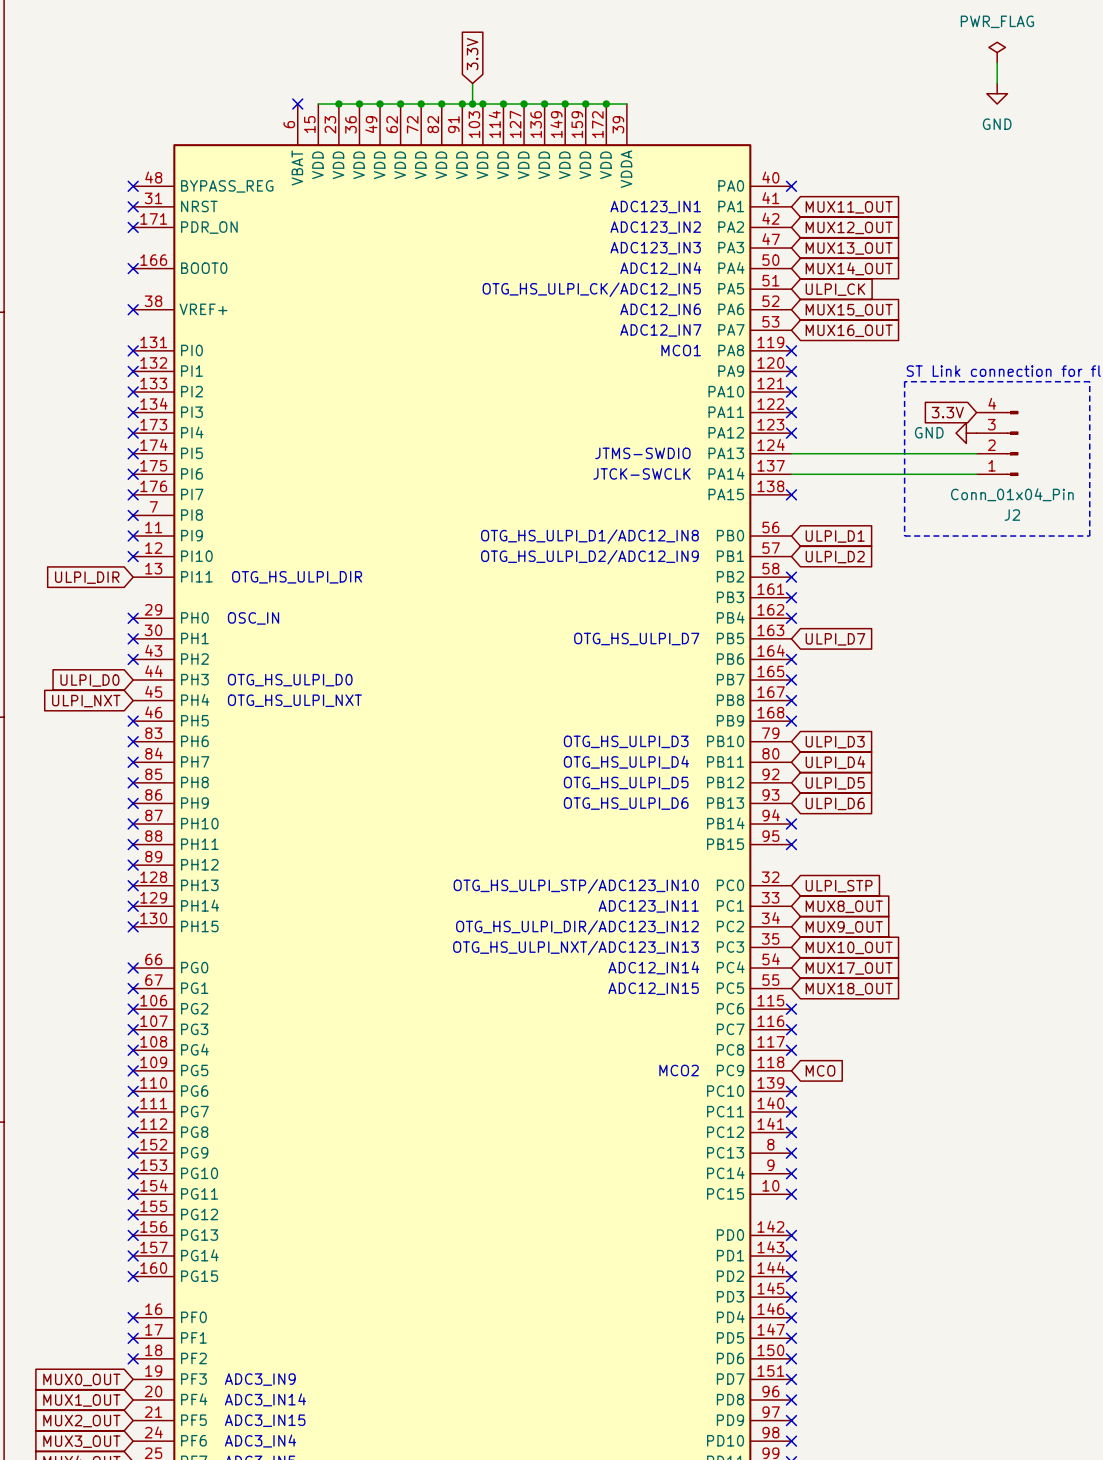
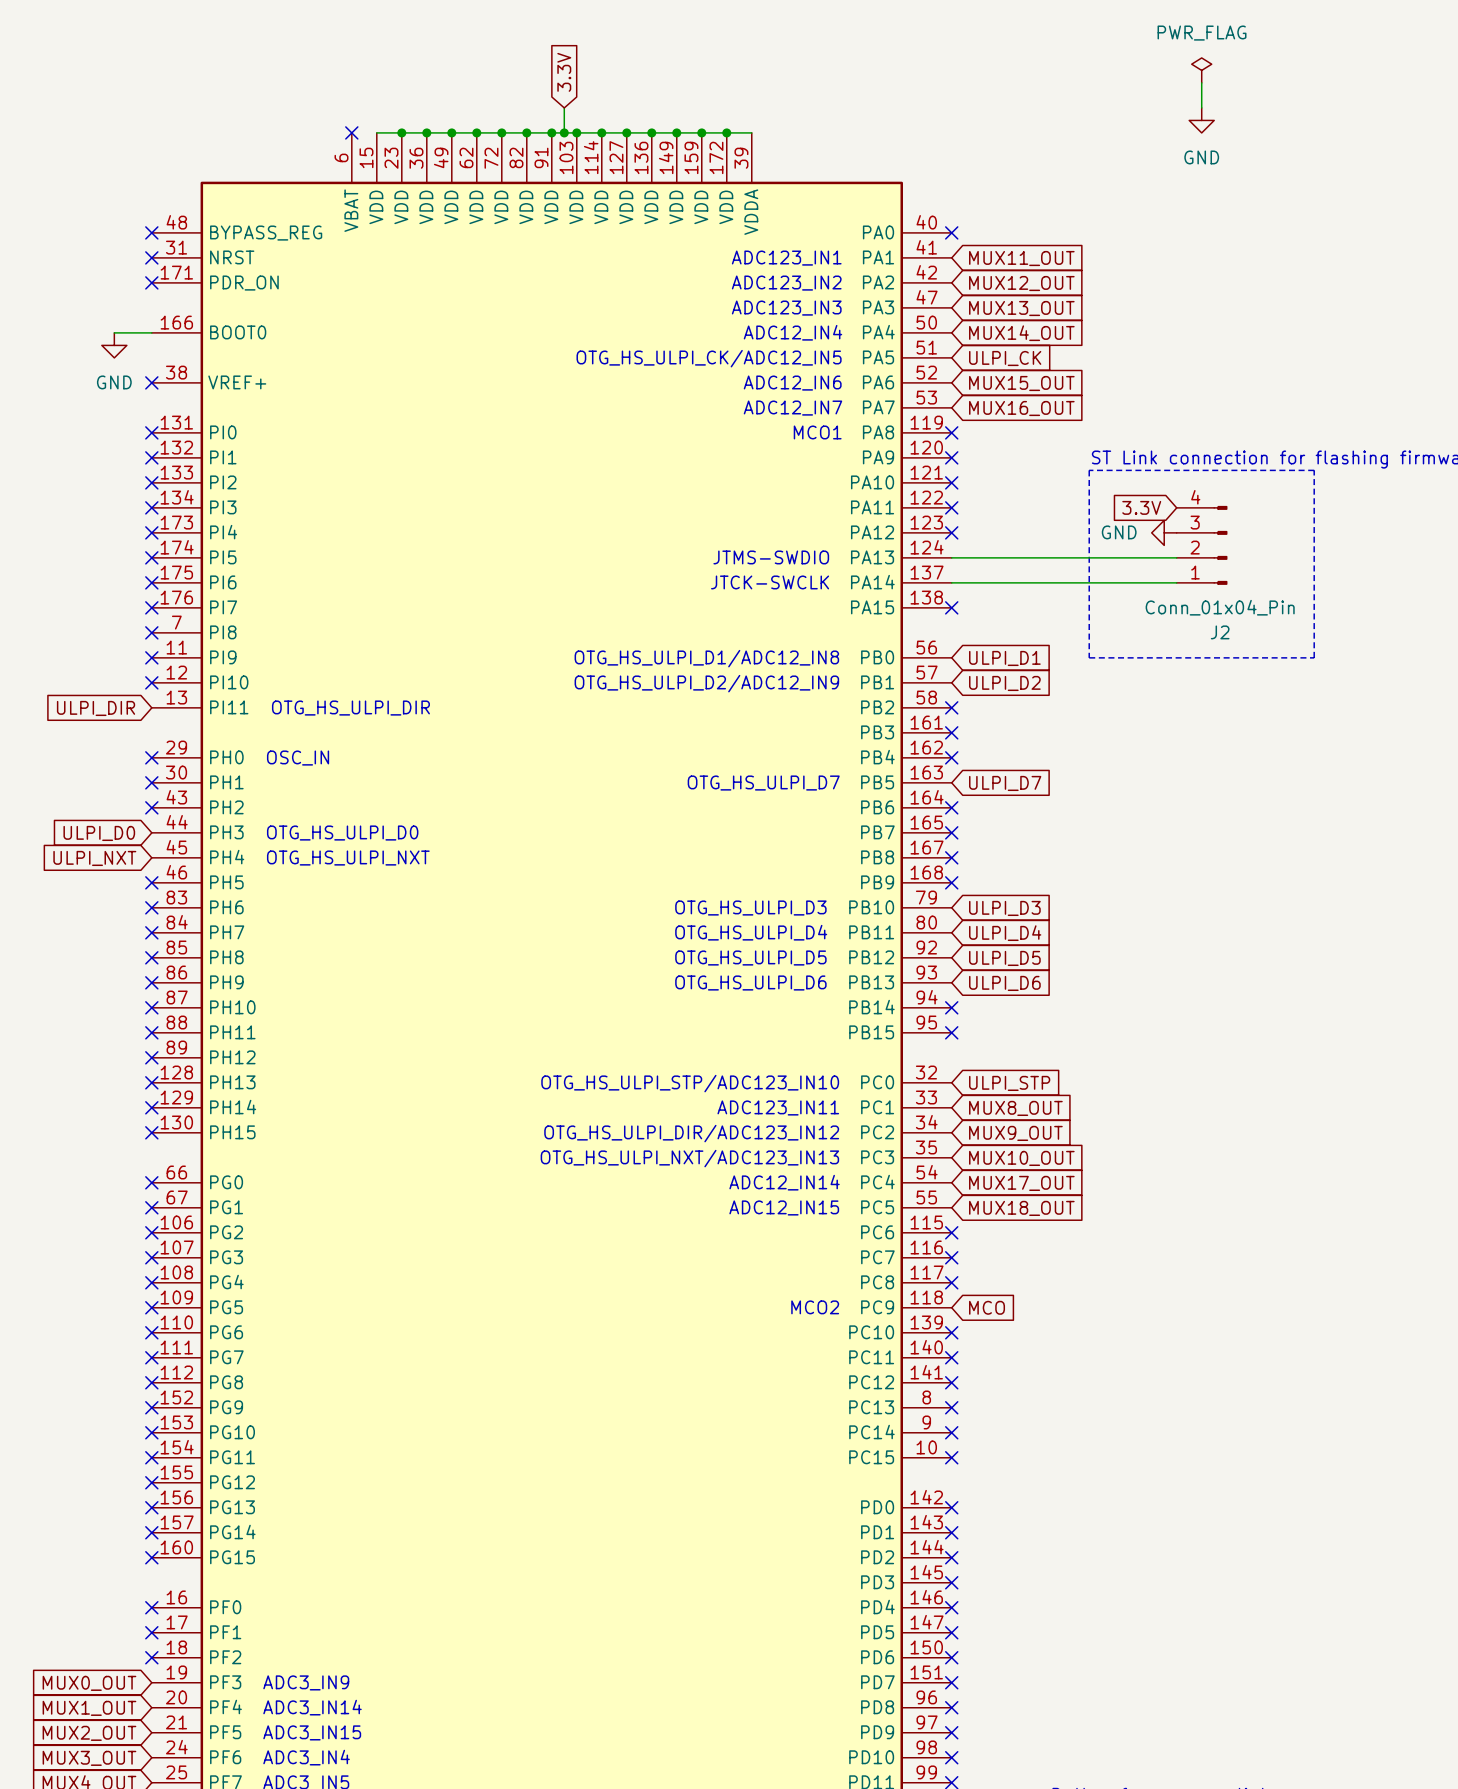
wire: none -> (114, 332) (151, 332)
no-connect mark: (133, 268) -> none
power symbol: none -> GND (114, 345)

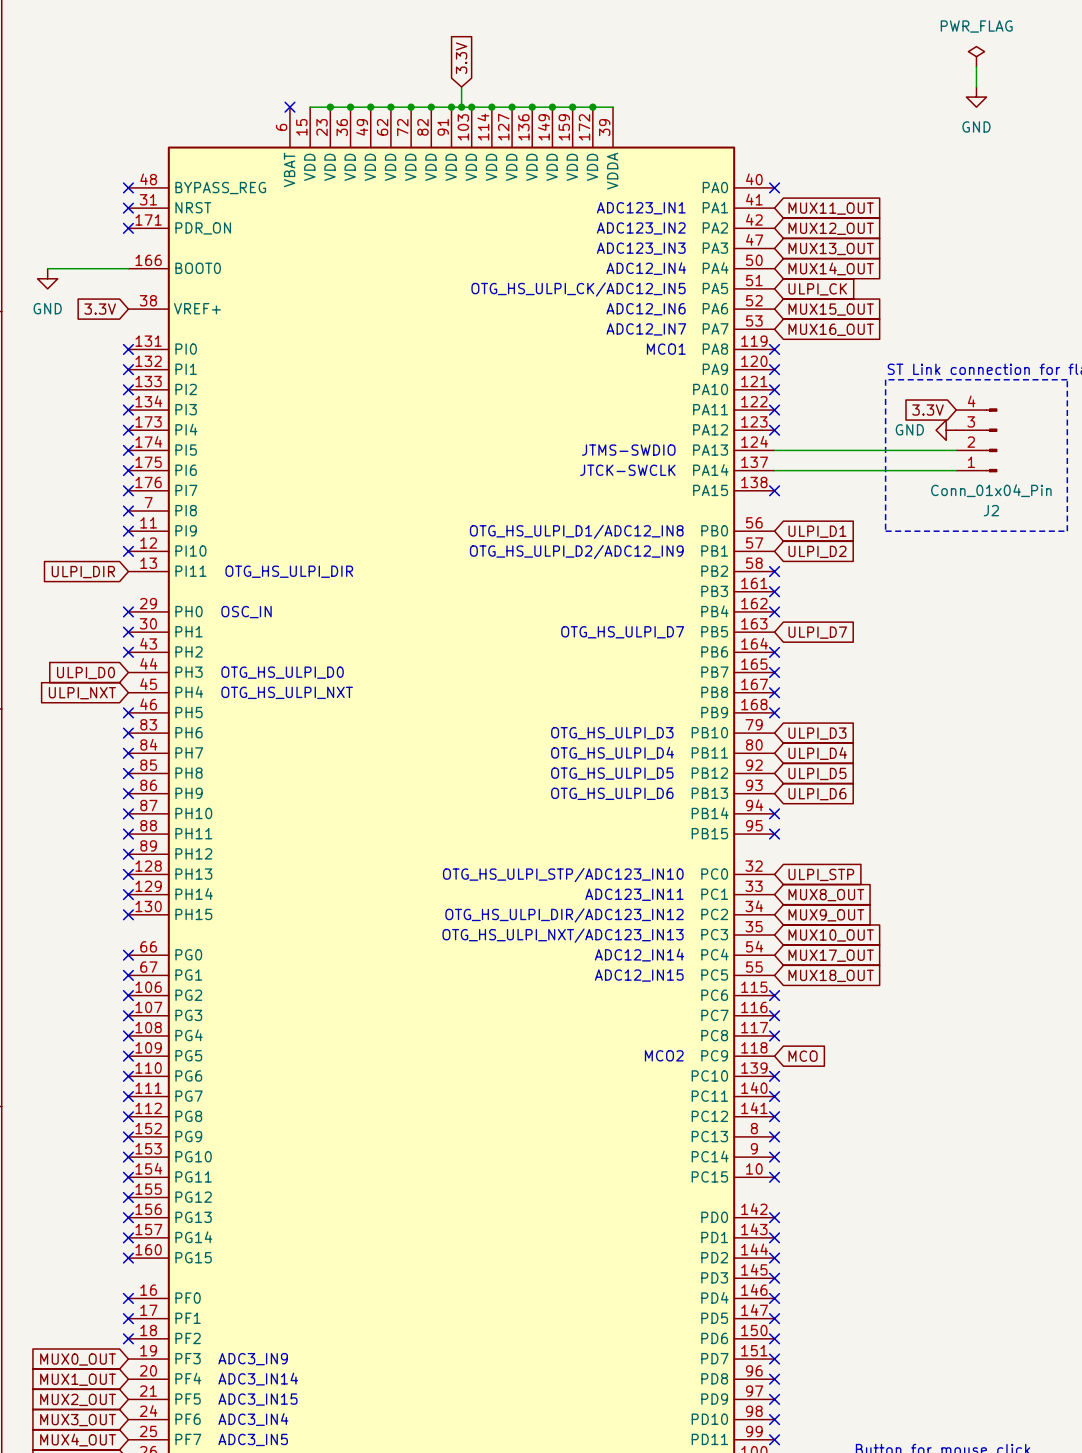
wire: none -> (47, 268) (98, 268)
power symbol position: GND (114, 345) -> GND (47, 278)
global label: none -> 3.3V (100, 309)
no-connect mark: (151, 382) -> none

